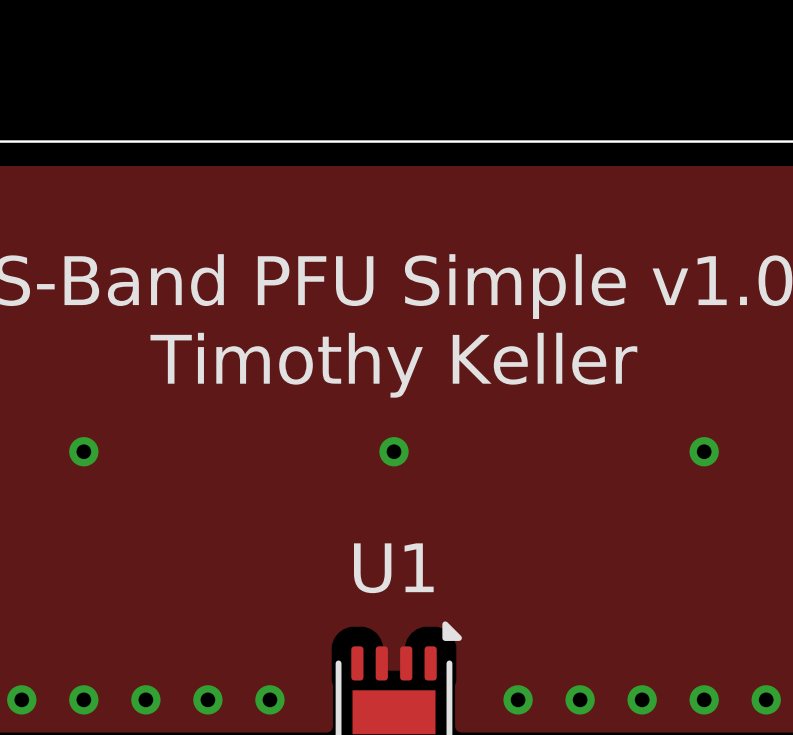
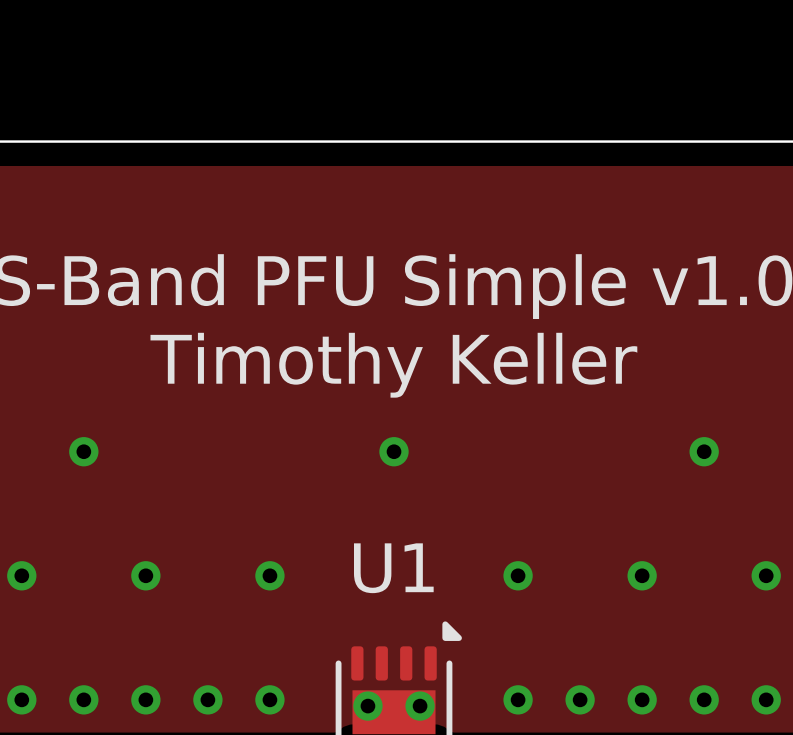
via: none -> (21, 575)
via: none -> (145, 575)
via: none -> (269, 575)
via: none -> (518, 575)
via: none -> (642, 575)
via: none -> (766, 575)
via: none -> (367, 706)
via: none -> (420, 706)

